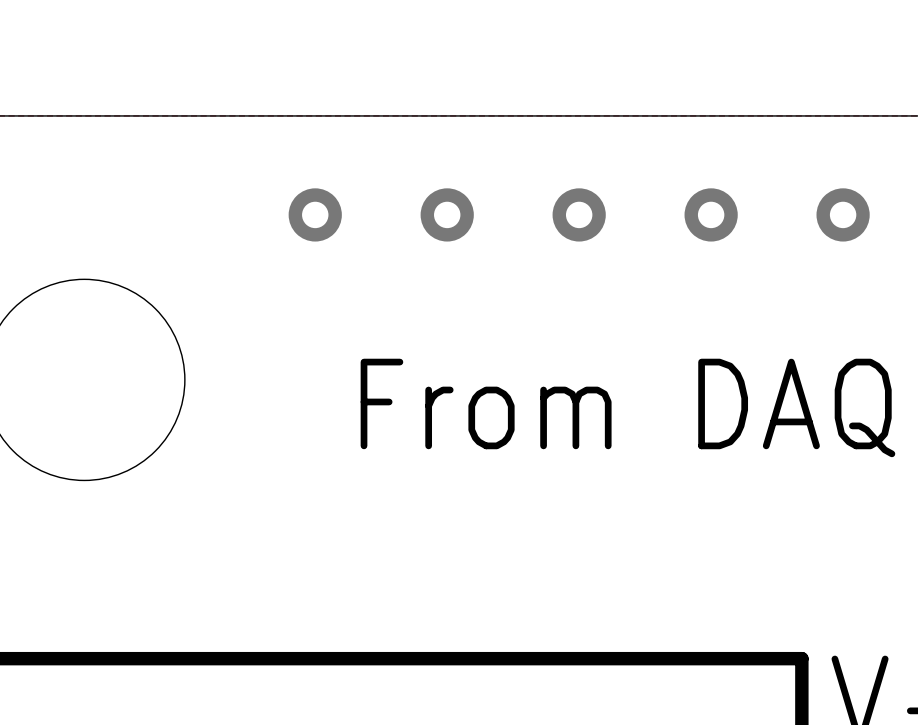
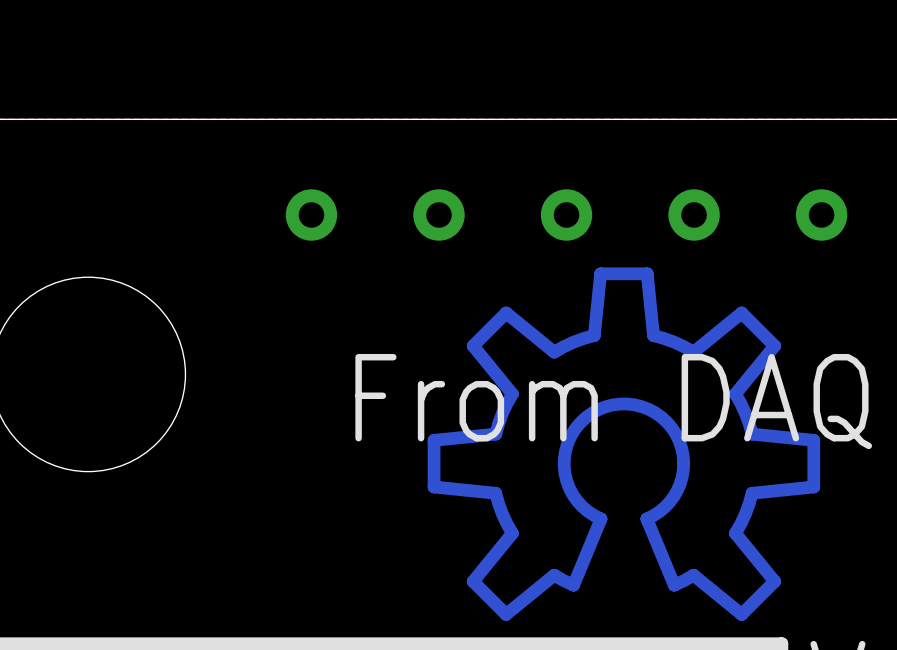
bottom track: none -> (600, 273) (594, 335) (573, 342) (554, 352) (506, 312) (473, 345) (512, 393) (502, 413) (495, 434) (434, 440) (434, 487) (495, 493) (502, 514) (512, 533) (473, 581) (506, 614) (554, 575) (573, 585) (601, 518) (582, 506) (572, 494) (566, 480) (564, 458) (567, 443) (574, 429) (590, 413) (611, 405) (634, 404) (648, 409) (661, 417) (672, 428) (679, 441) (683, 456) (683, 470) (677, 490) (664, 507) (646, 518) (674, 585) (693, 575) (741, 614) (774, 581) (735, 533) (745, 514) (752, 493) (813, 487) (813, 440) (752, 434) (745, 413) (735, 393) (774, 345) (741, 312) (693, 352) (674, 342) (653, 335) (647, 273) (600, 273)

